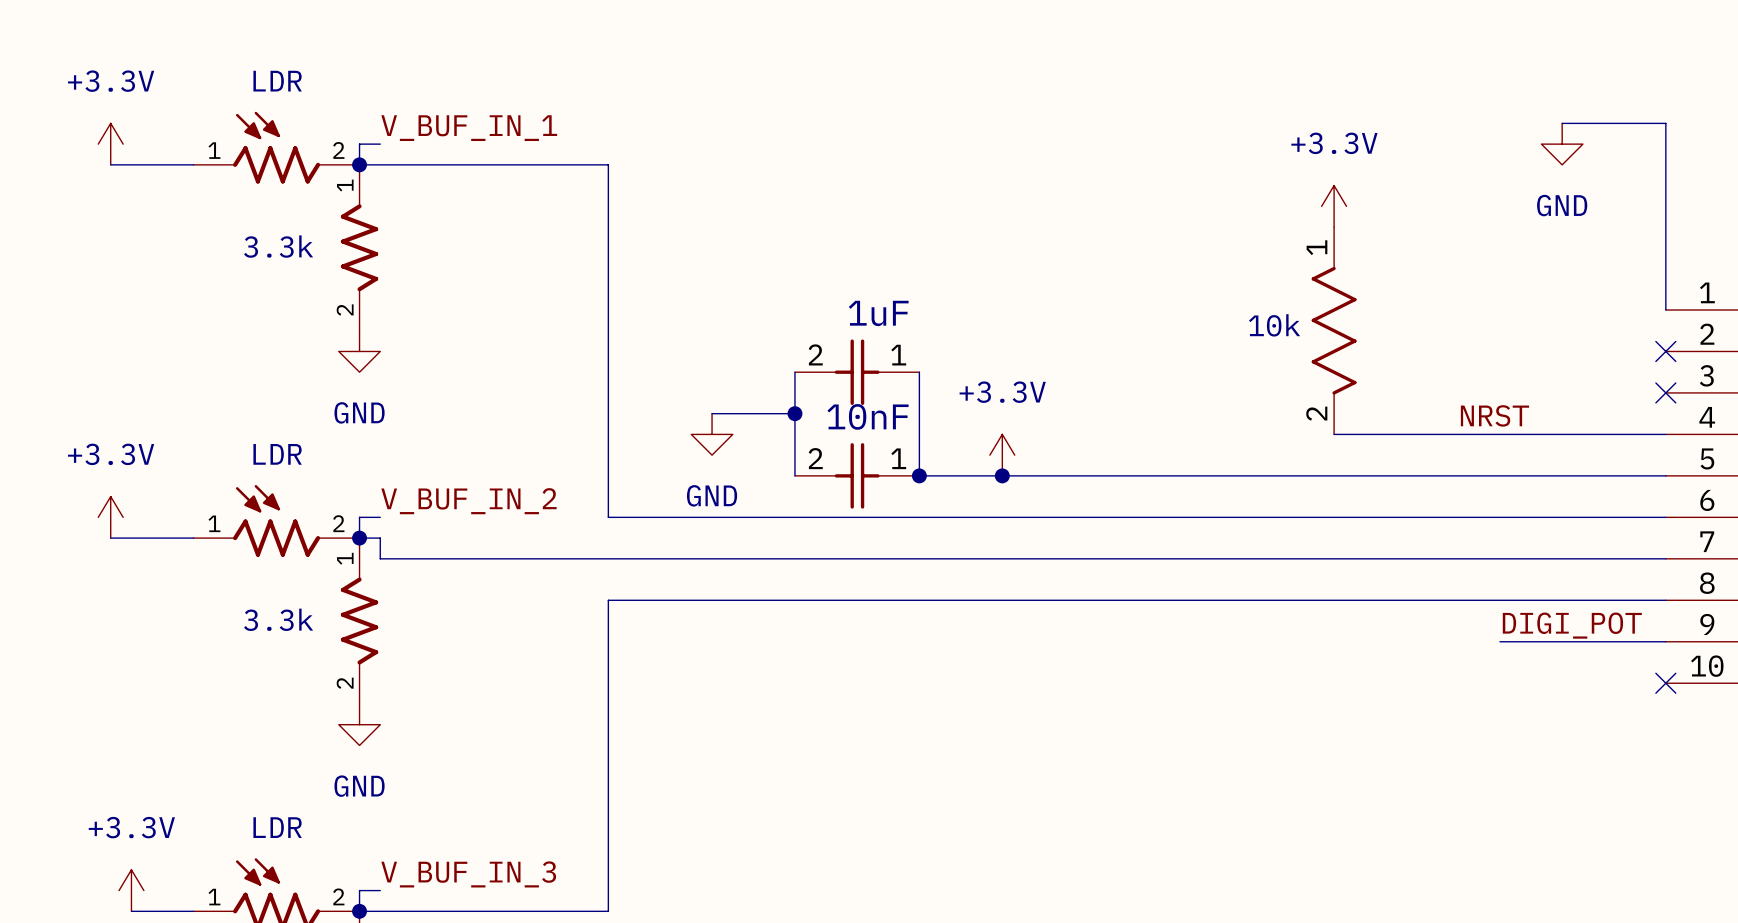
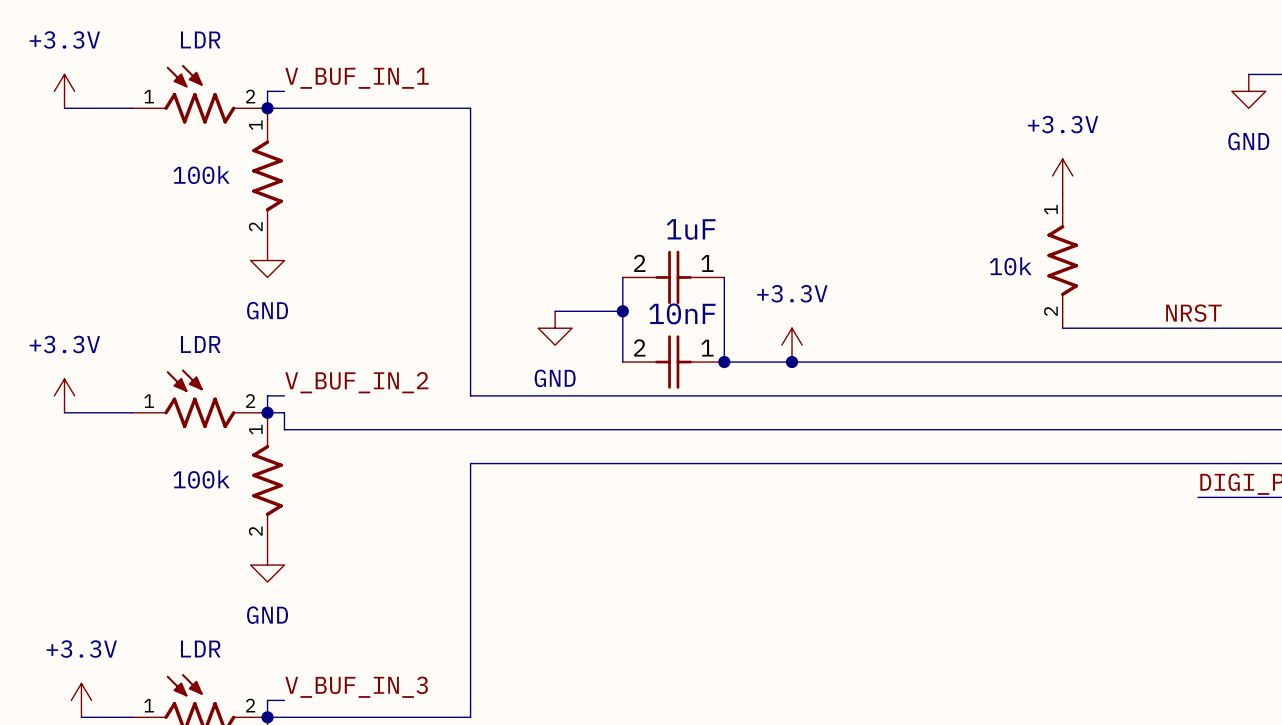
power symbol position: +3.3V (1334, 206) -> +3.3V (1062, 175)
part value: 3.3k (278, 246) -> 100k (201, 174)
part: 10k (1334, 330) -> none
part: none -> 10k (1062, 260)
part value: 3.3k (278, 619) -> 100k (201, 479)

